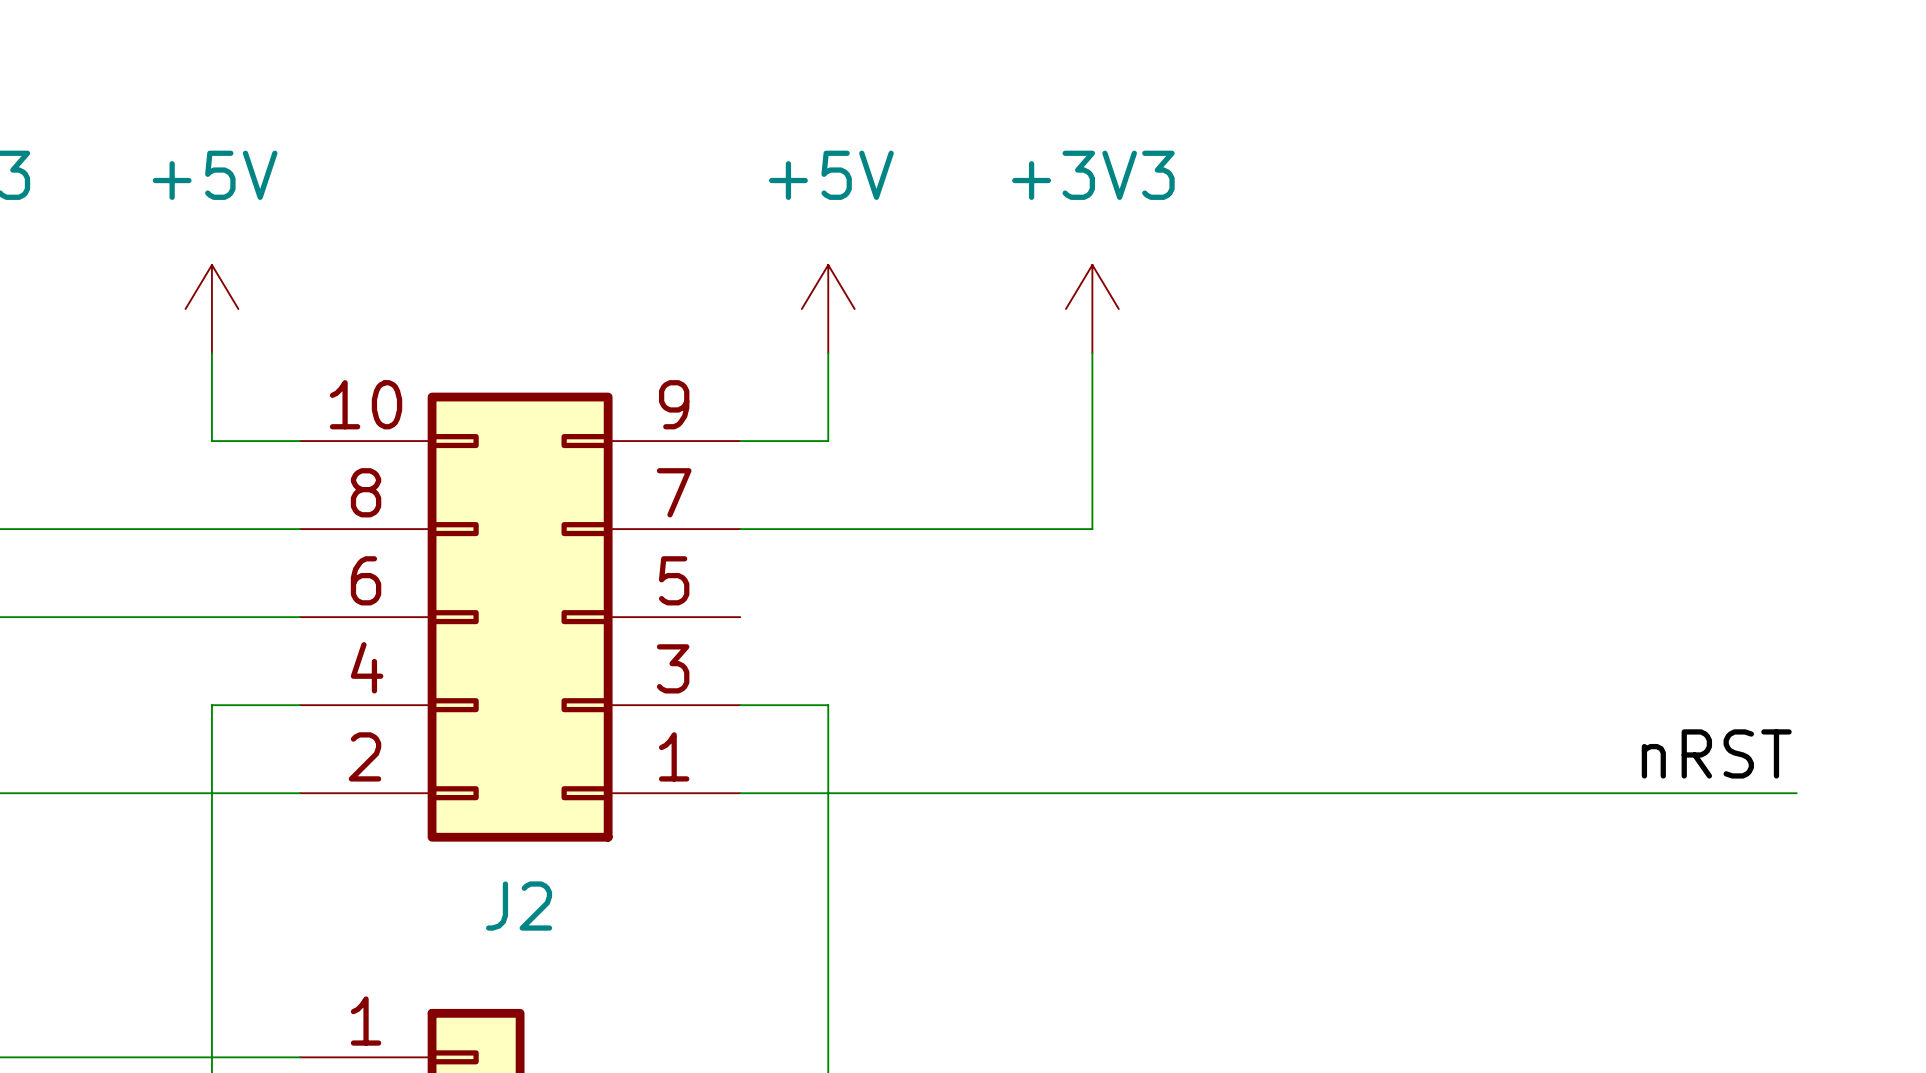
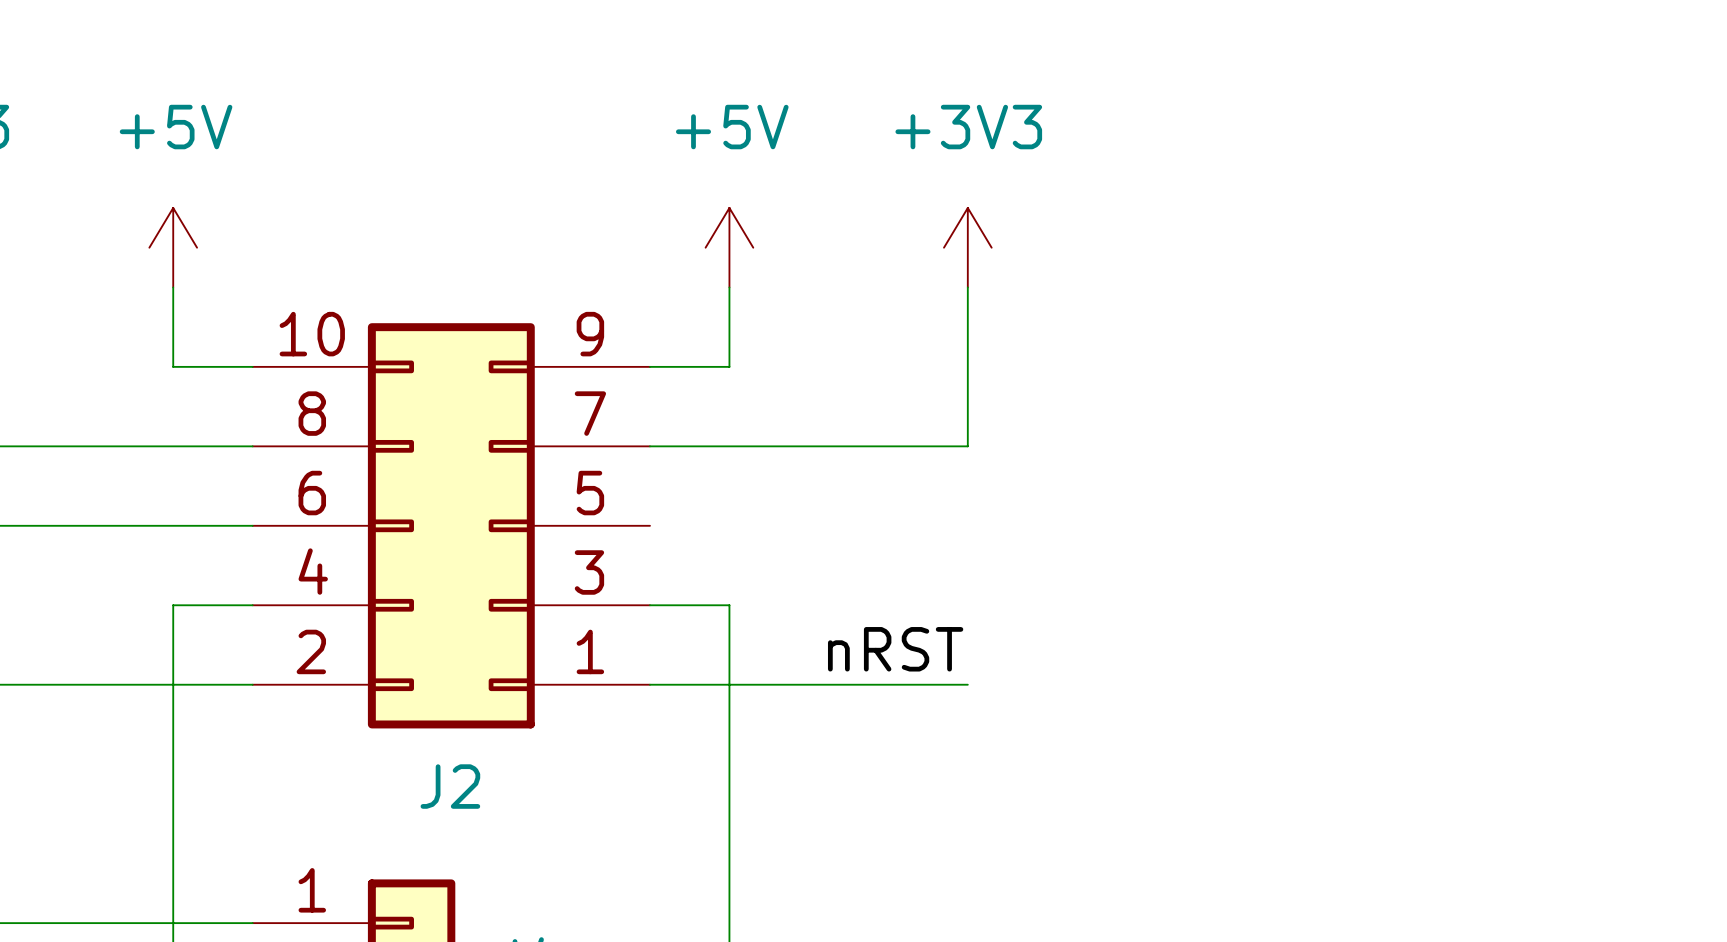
label position: nRST (1716, 753) -> nRST (895, 649)
wire: (1092, 793) (1796, 793) -> none

